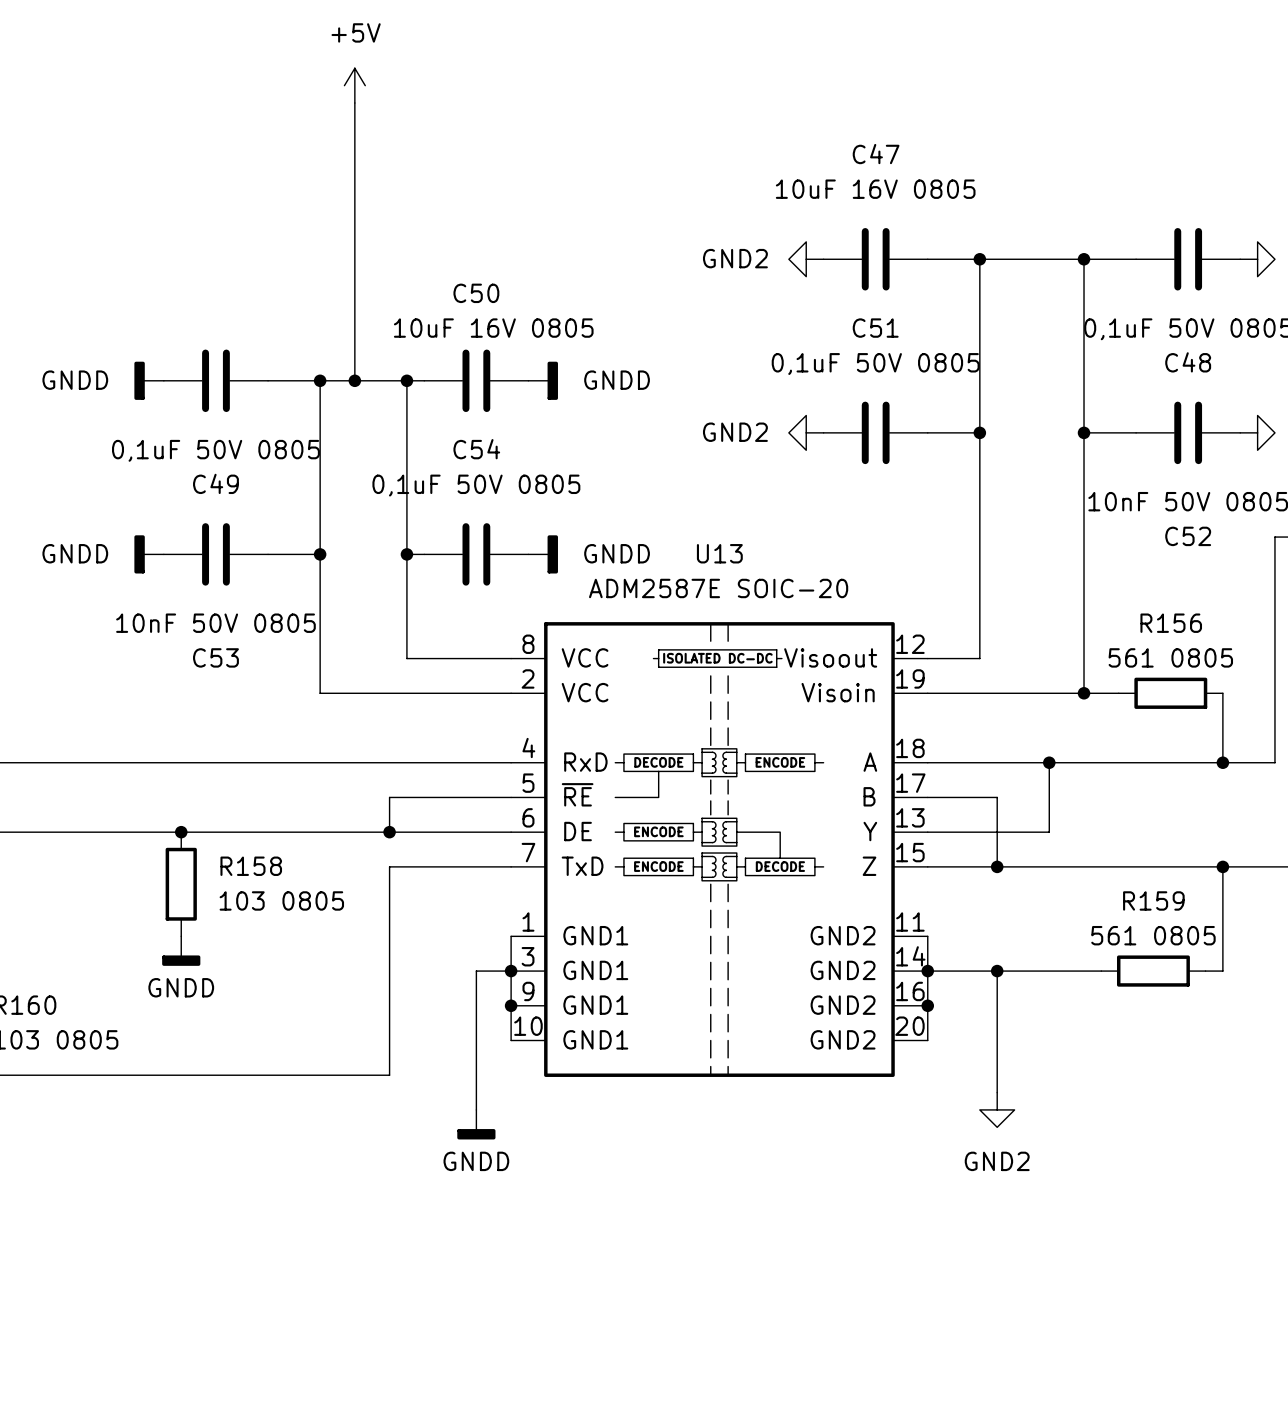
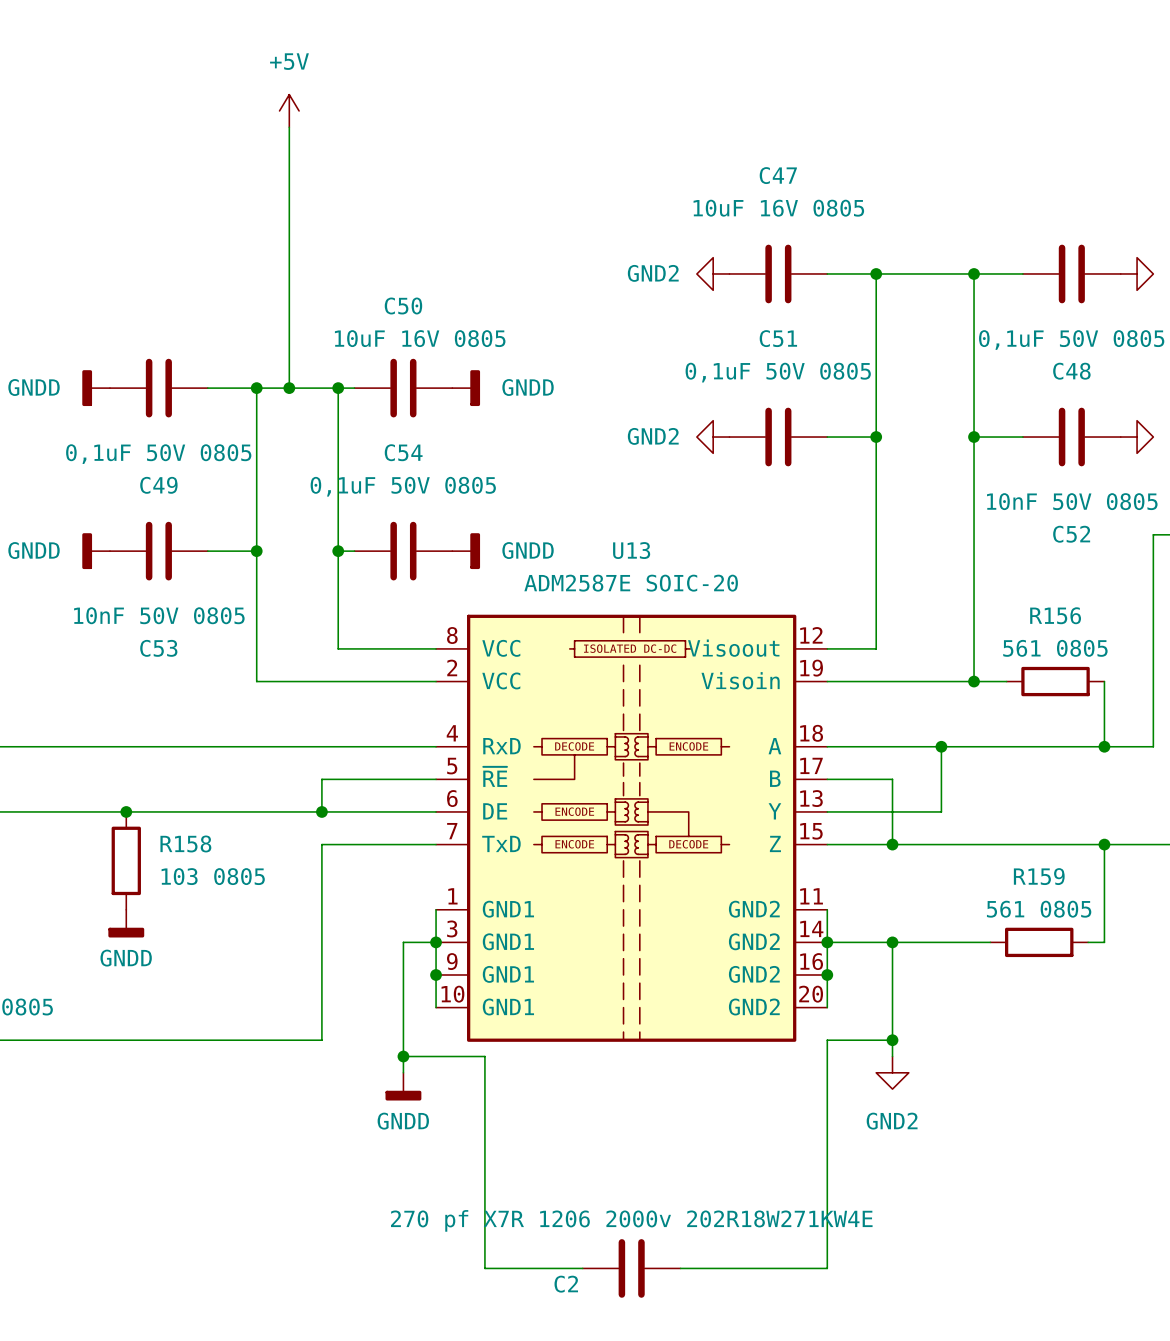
wire: none -> (892, 1040) (827, 1040) (827, 1268) (680, 1268)
junction: none -> (892, 1040)
wire: none -> (403, 1056) (484, 1056) (484, 1268) (582, 1268)
junction: none -> (403, 1056)
C2: none -> 270 pf X7R 1206 2000v 202R18W271KW4E (631, 1268)

